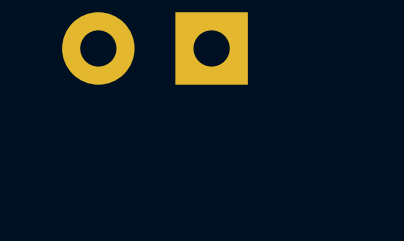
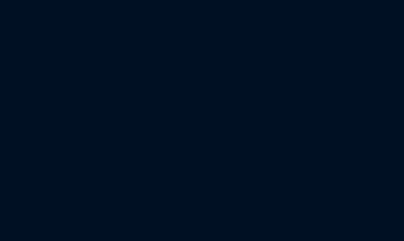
part: (154, 48) -> none

